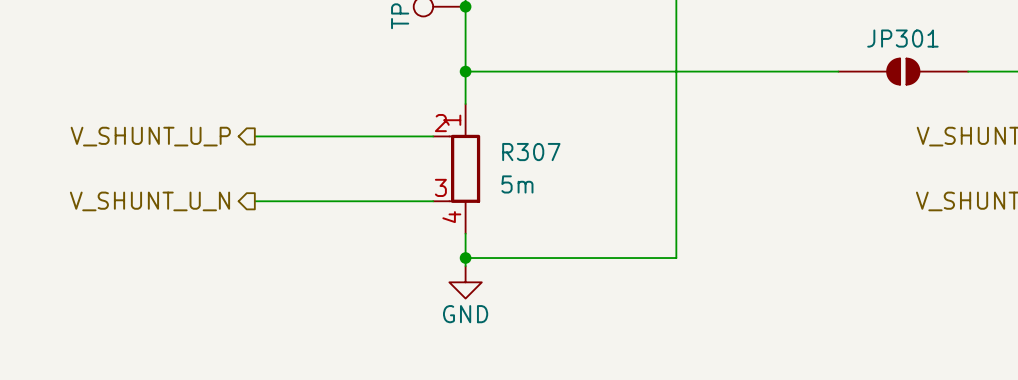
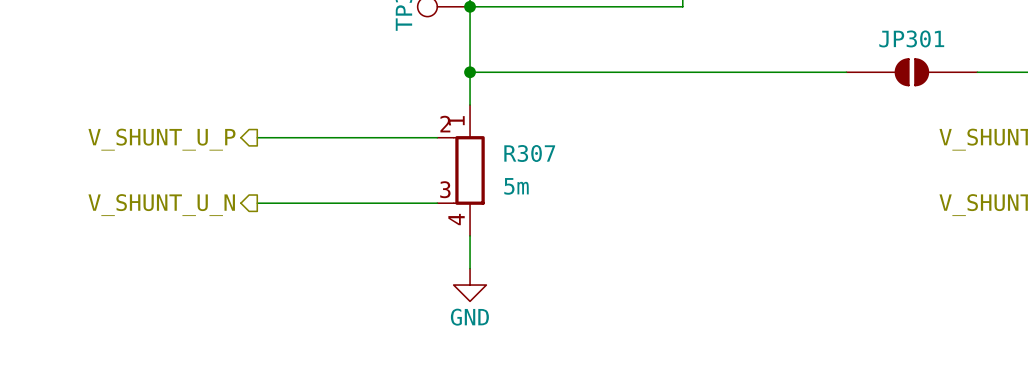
wire: (676, 6) (676, 258) (465, 258) -> (682, 6) (470, 6)
junction: (465, 258) -> none

